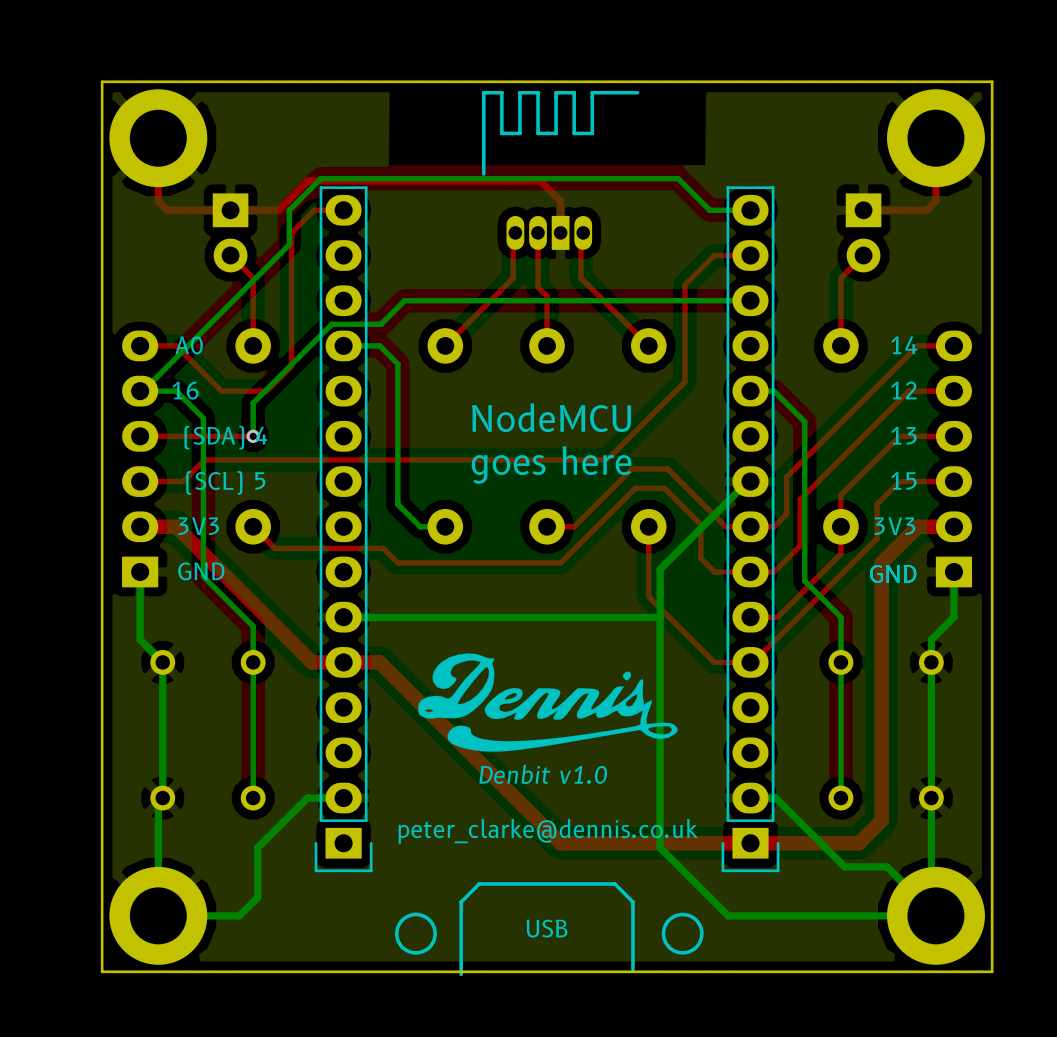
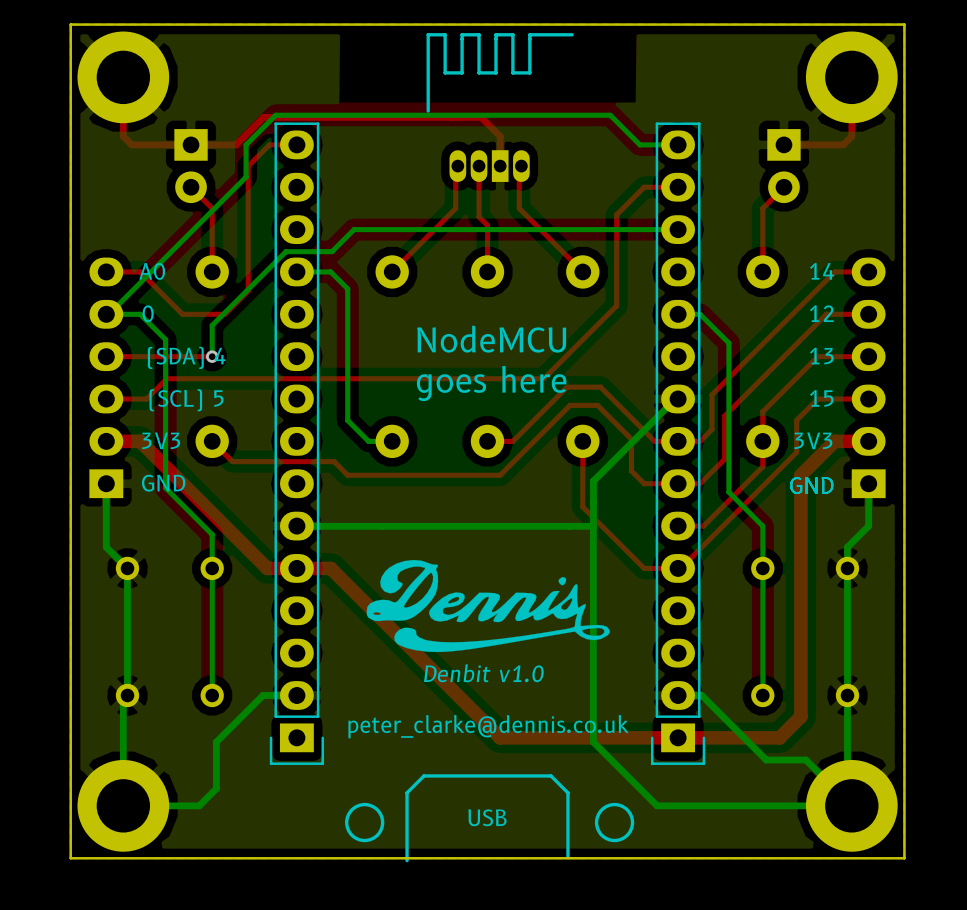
text: 16 (185, 390) -> 0 (148, 313)

